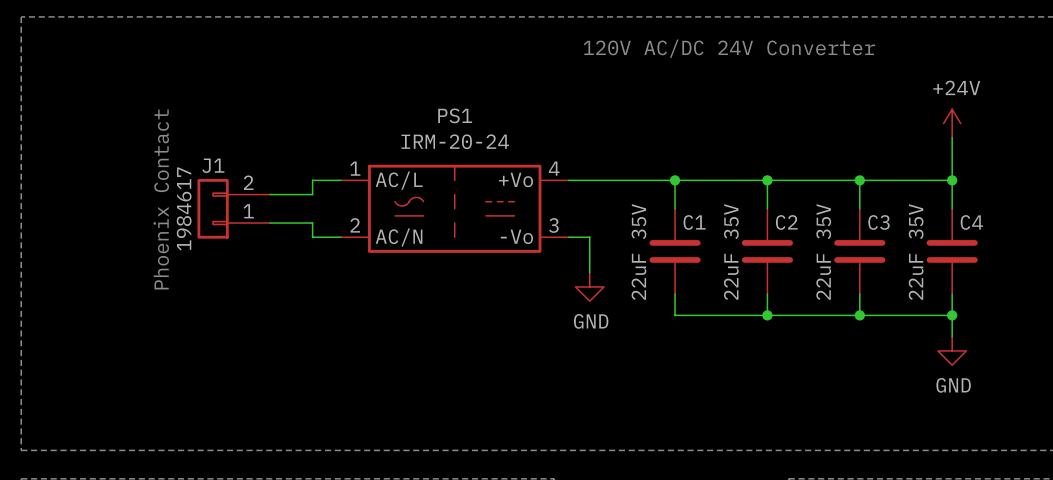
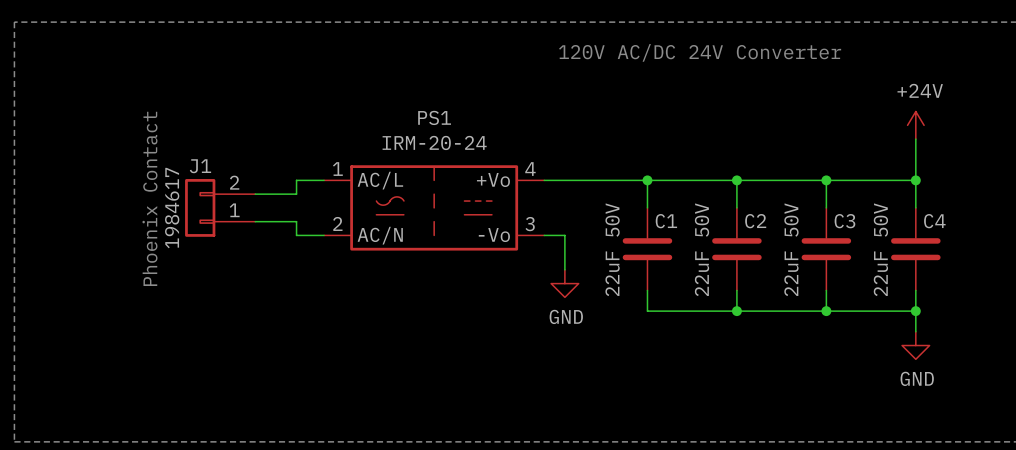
C1 value: 22uF 35V (638, 252) -> 22uF 50V (612, 249)
C2 value: 22uF 35V (731, 252) -> 22uF 50V (702, 249)
C3 value: 22uF 35V (823, 252) -> 22uF 50V (791, 249)
C4 value: 22uF 35V (916, 252) -> 22uF 50V (880, 249)

